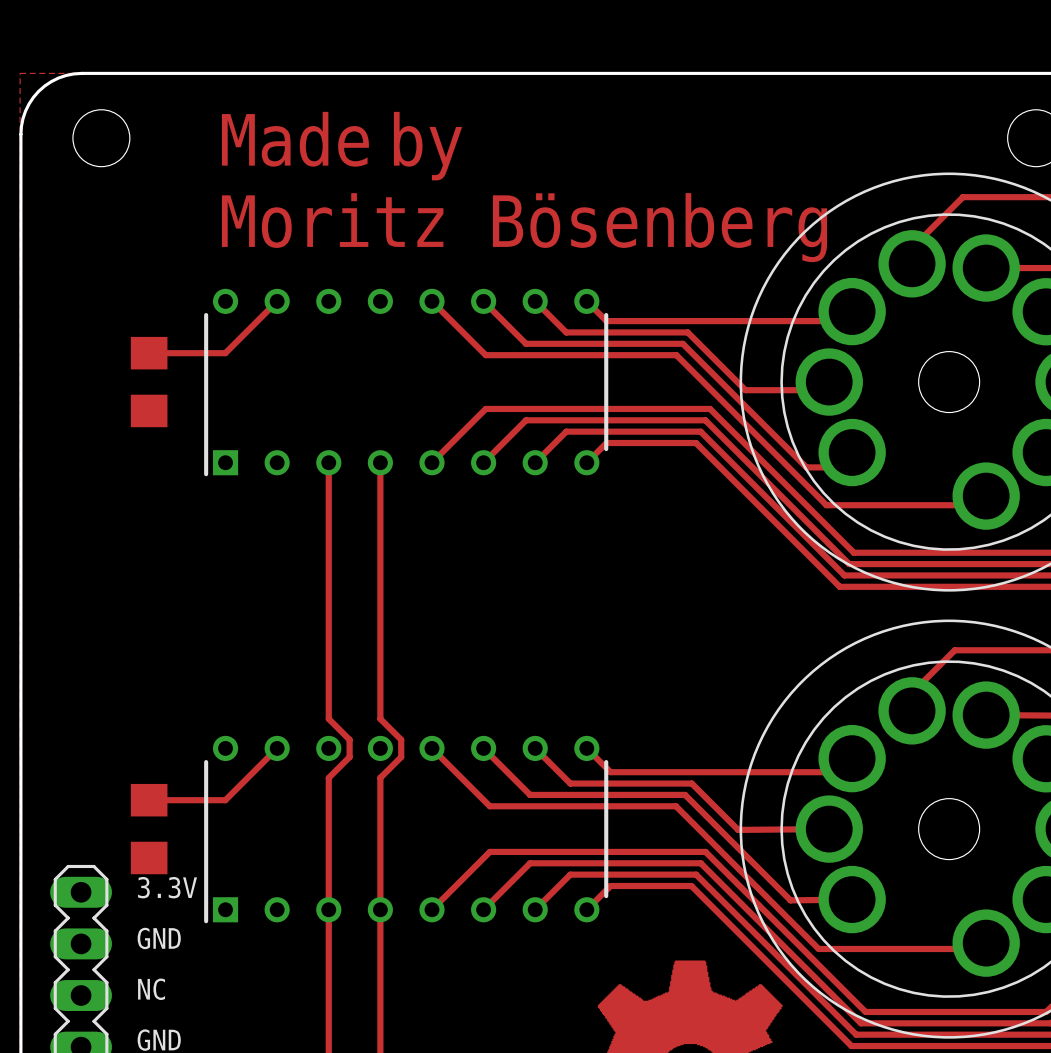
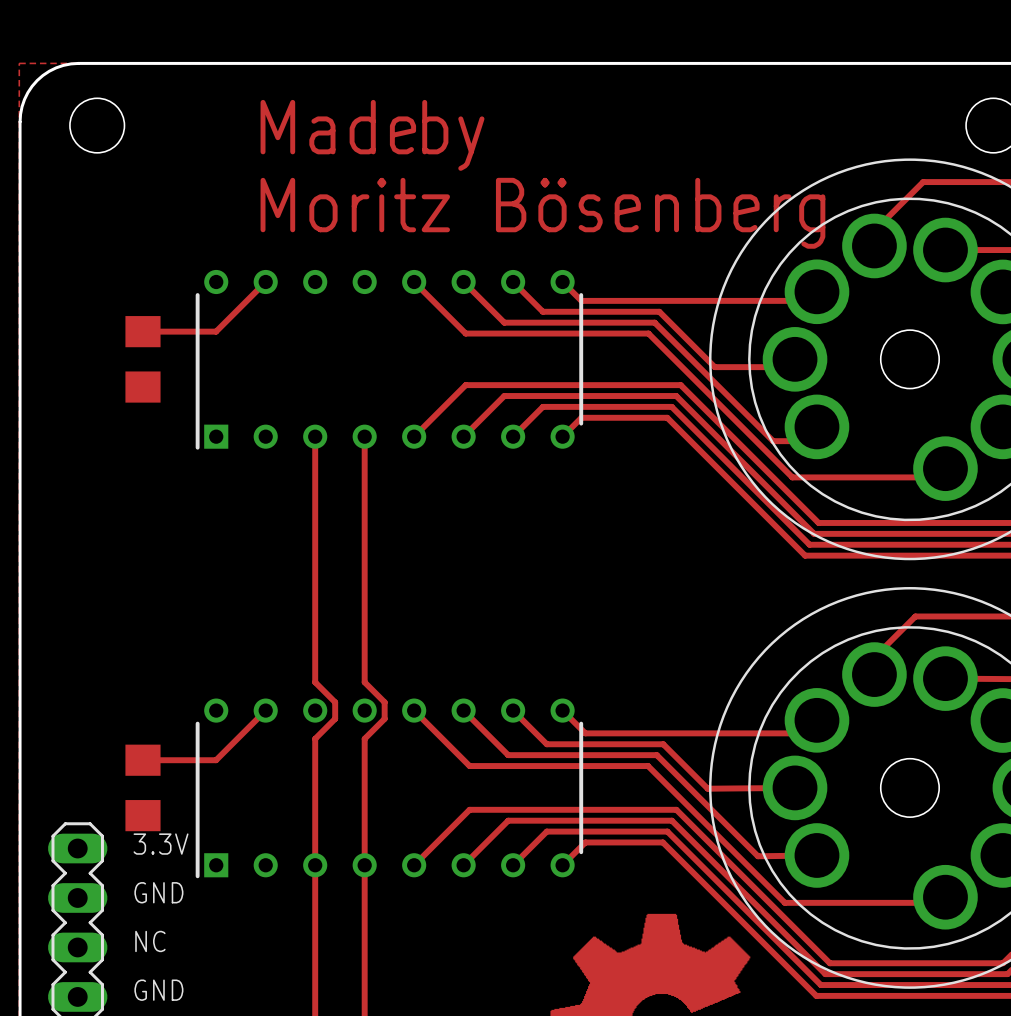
text position: Made (295, 139) -> Made (338, 127)
text position: by (428, 146) -> by (453, 135)
text position: Moritz Bösenberg (524, 227) -> Moritz Bösenberg (542, 213)

